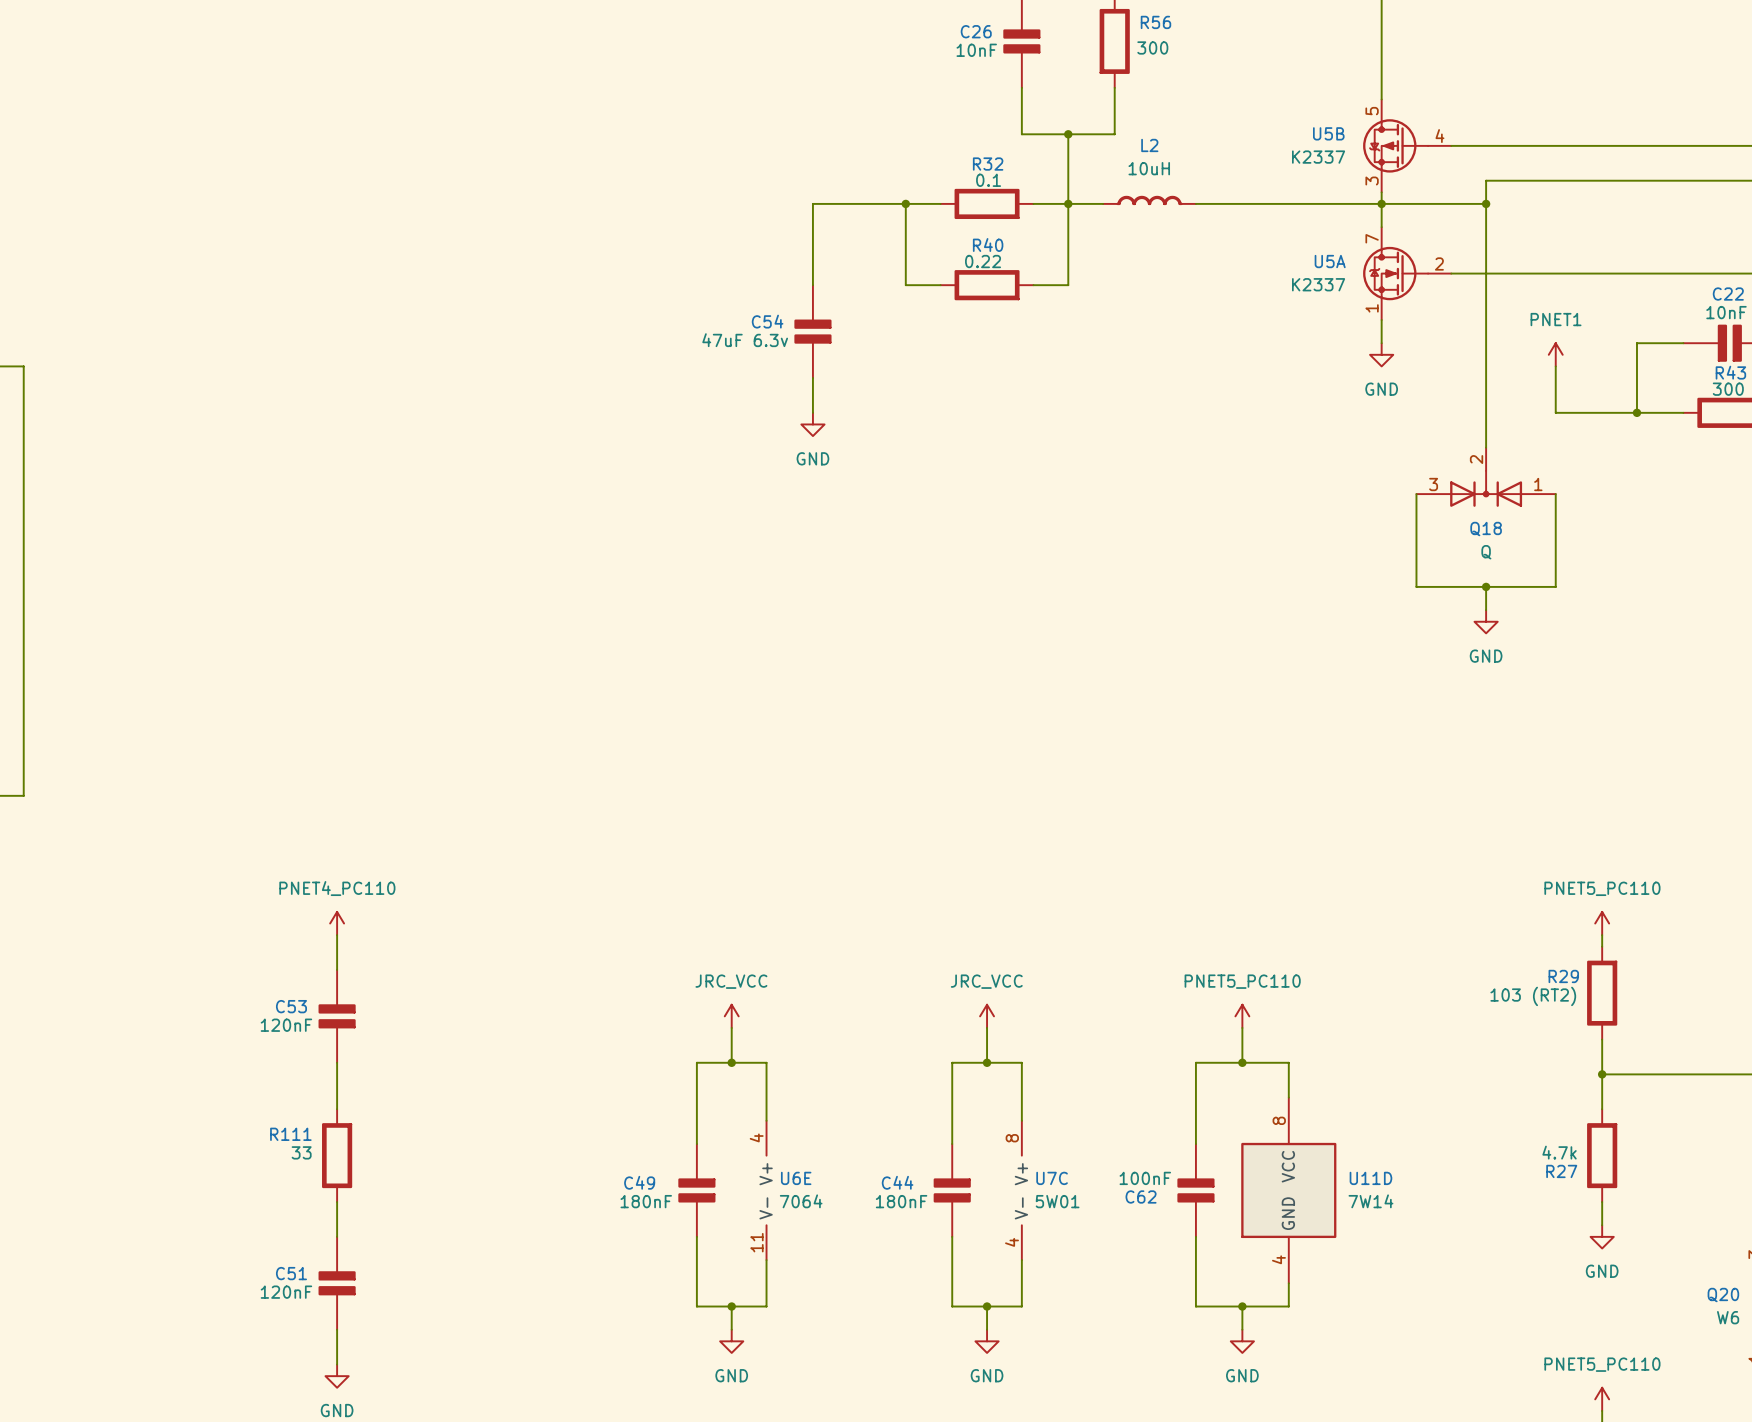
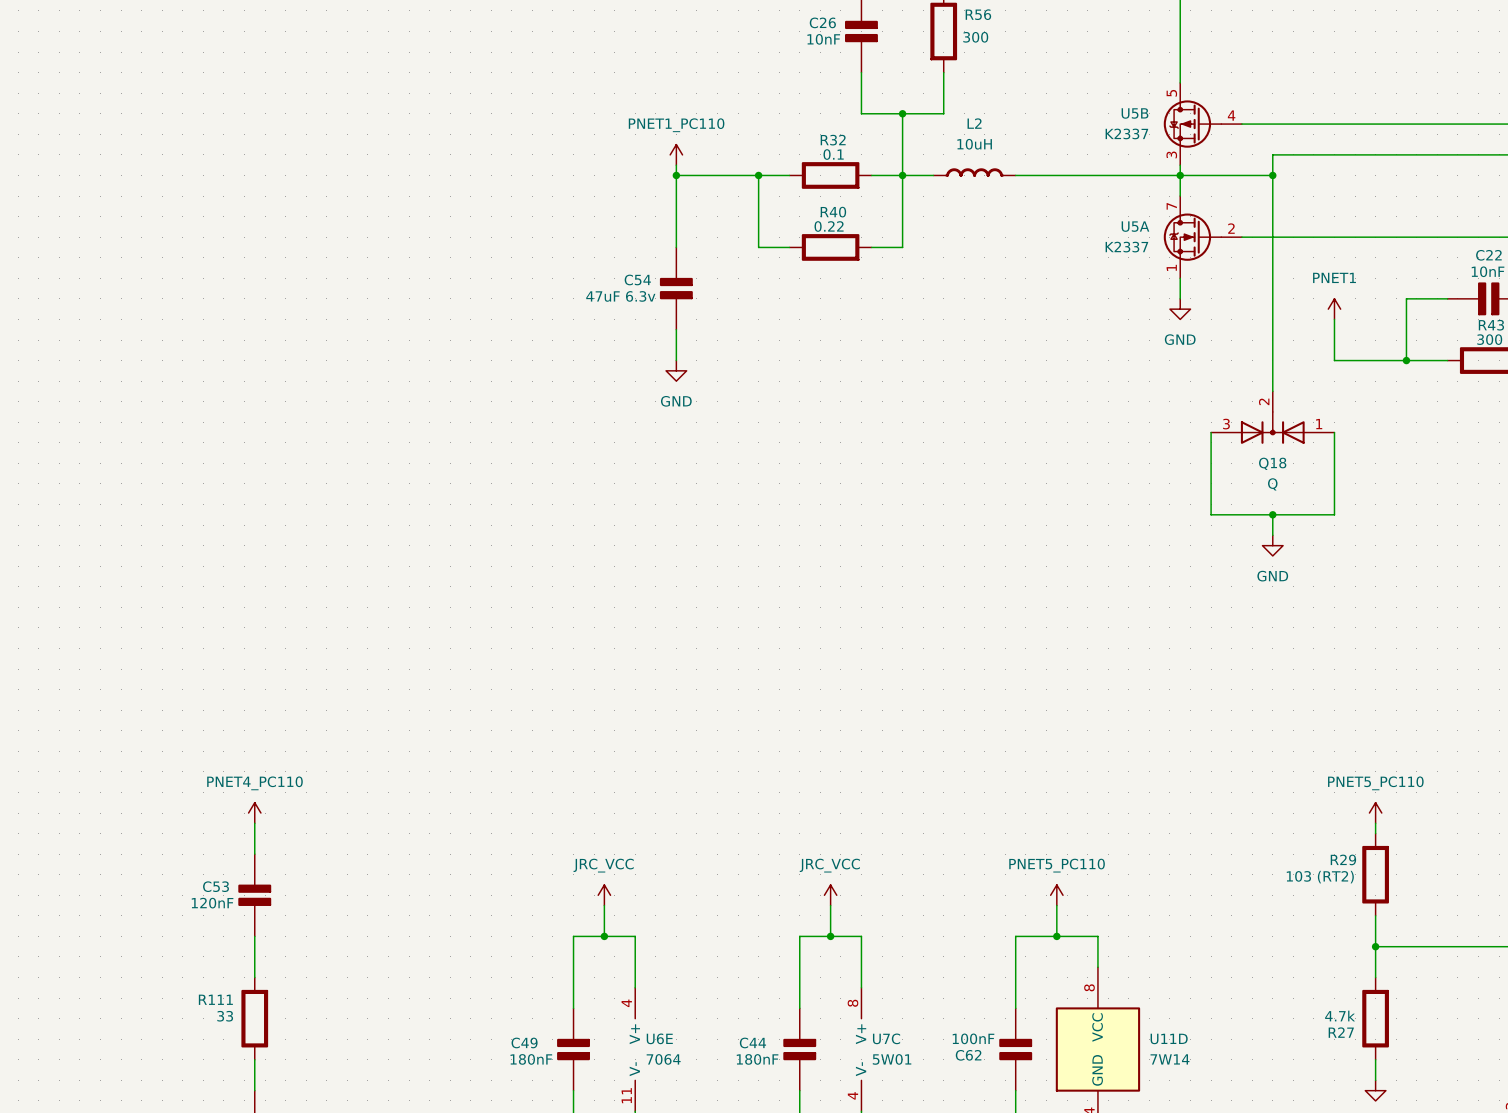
power symbol: none -> PNET1_PC110 (676, 154)
wire: none -> (676, 165) (676, 175)
junction: none -> (676, 175)

